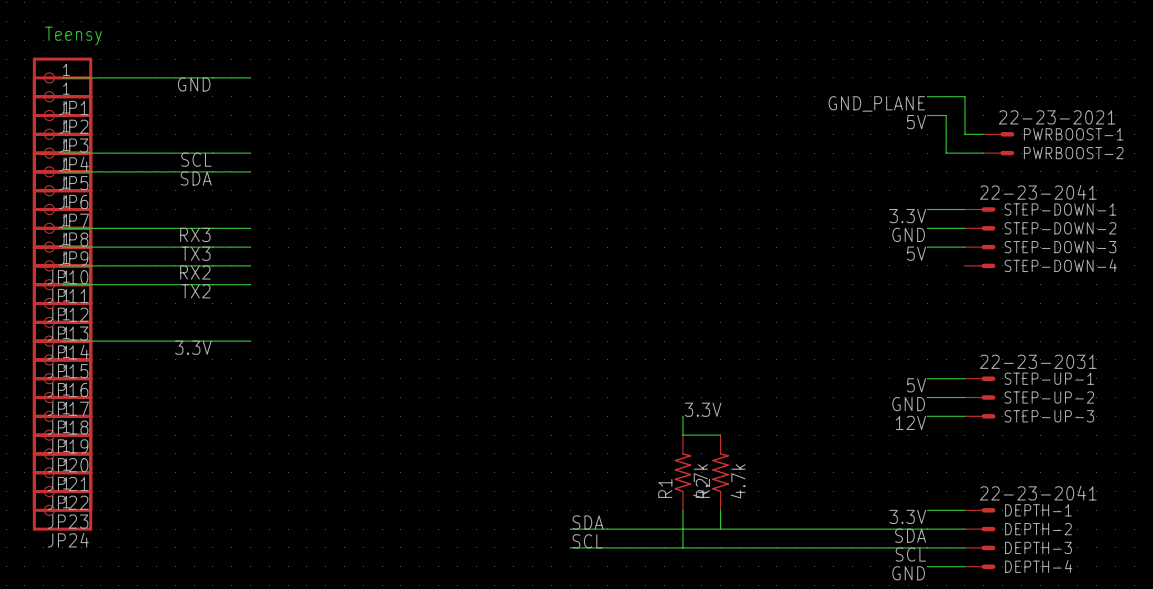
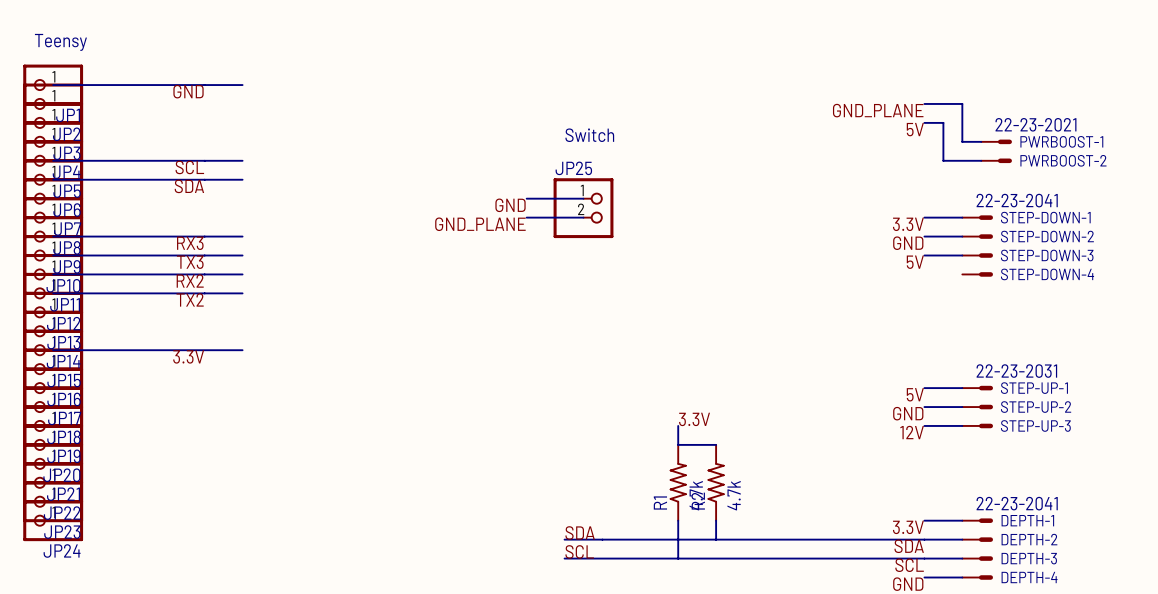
text: none -> Switch (589, 135)
wire: none -> (526, 198) (583, 198)
label: none -> GND (510, 205)
JP25: none -> (583, 208)
wire: none -> (526, 217) (583, 217)
label: none -> GND_PLANE (480, 224)

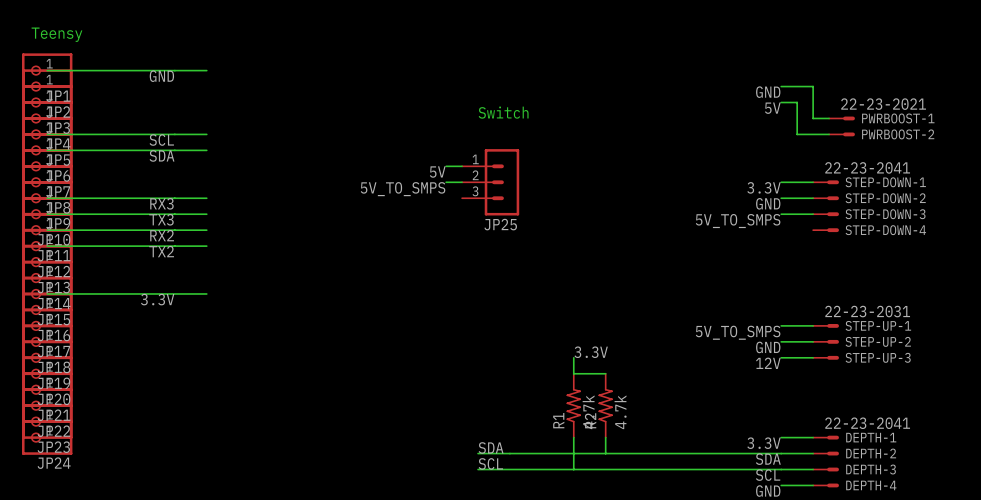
label: GND_PLANE (878, 110) -> GND (768, 92)
JP25 name position: JP25 (573, 168) -> JP25 (500, 224)
JP25 symbol: [553, 178, 614, 239] -> [462, 149, 520, 216]
label: GND (510, 205) -> 5V (437, 172)
label: GND_PLANE (480, 224) -> 5V_TO_SMPS (403, 189)
label: 5V (915, 262) -> 5V_TO_SMPS (738, 221)
label: 5V (915, 394) -> 5V_TO_SMPS (738, 332)

